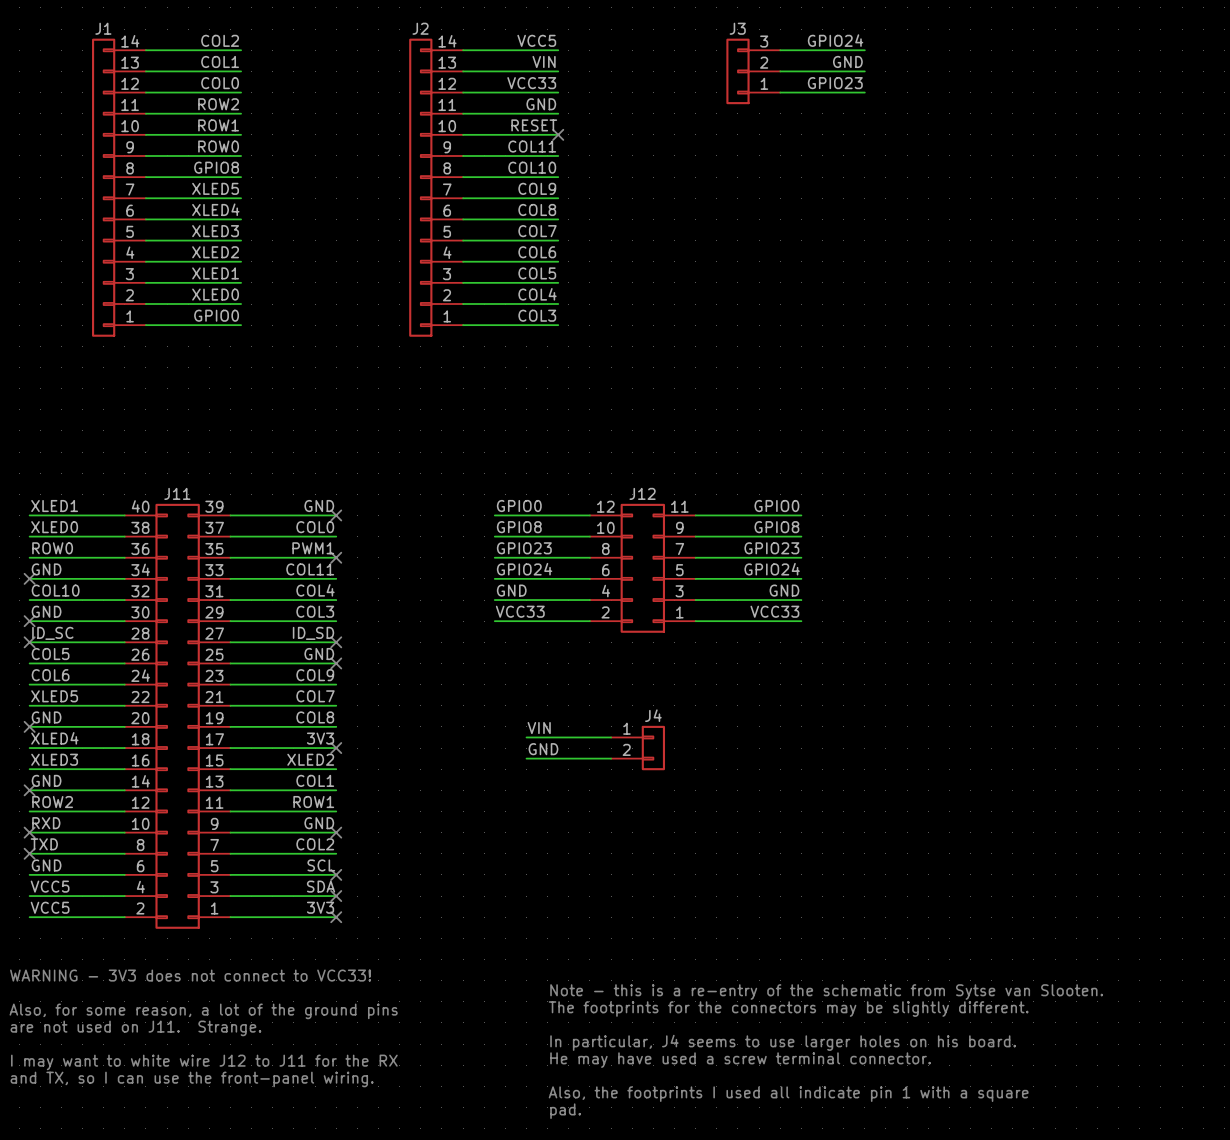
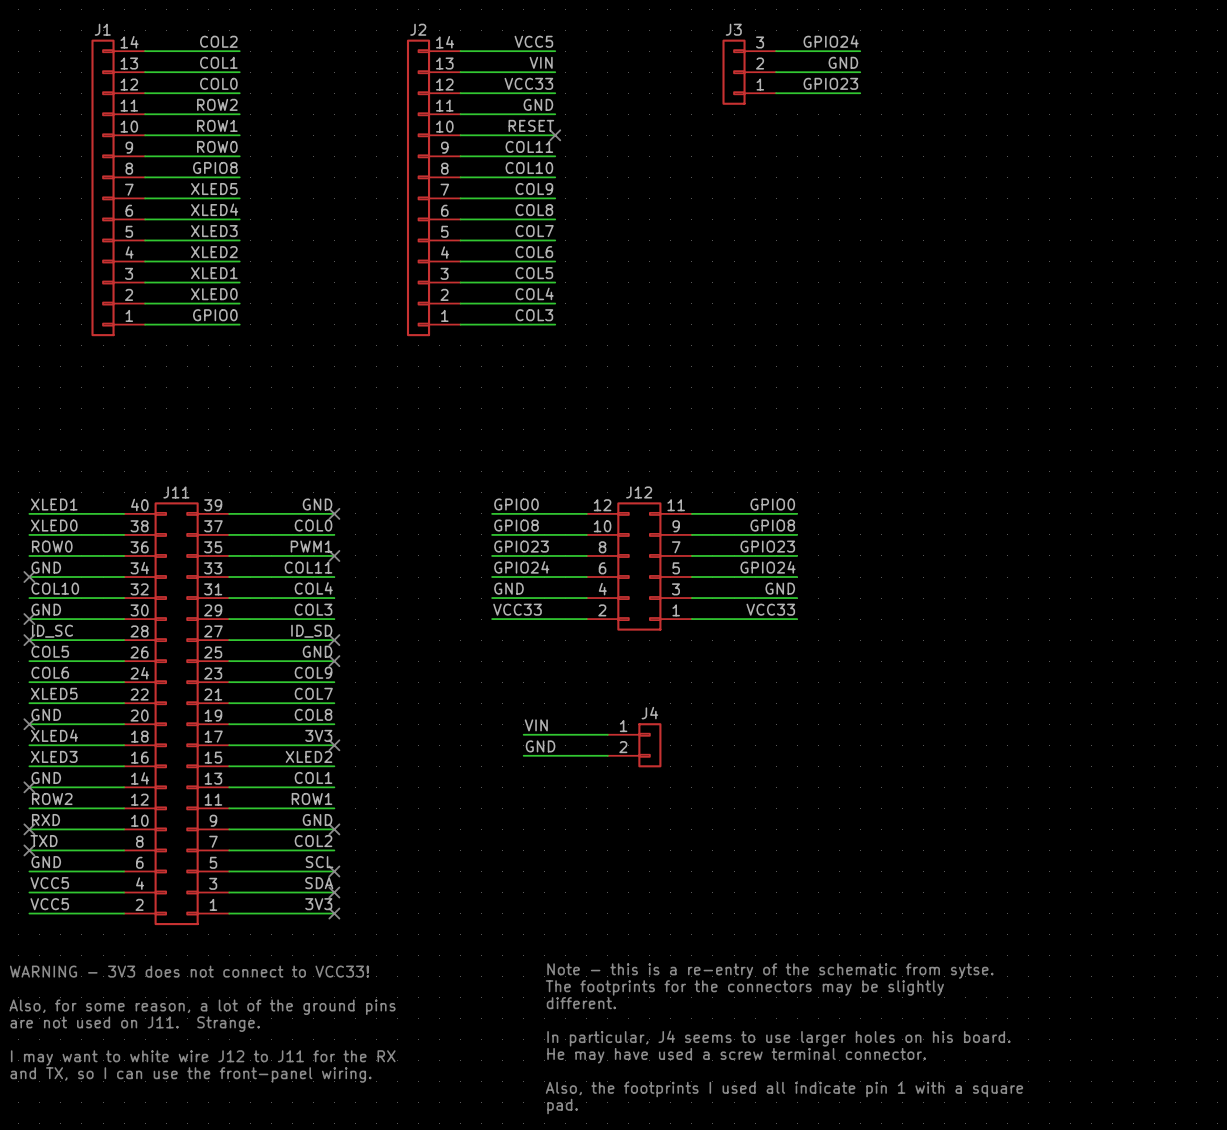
text: none -> Note - this is a re-entry of the schematic from sytse. (770, 971)
text: Note - this is a re-entry of the schematic from Sytse van Slooten. (826, 992) -> The footprints for the connectors may be slightly (744, 987)
text: The footprints for the connectors may be slightly different. (788, 1009) -> different. (581, 1003)

